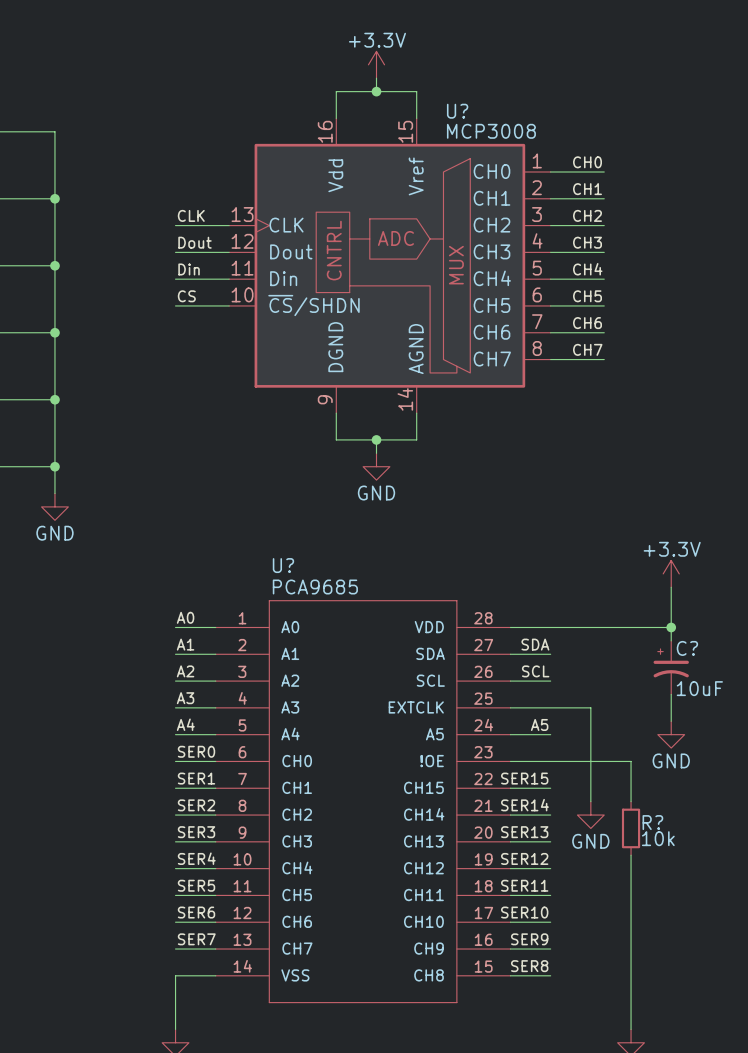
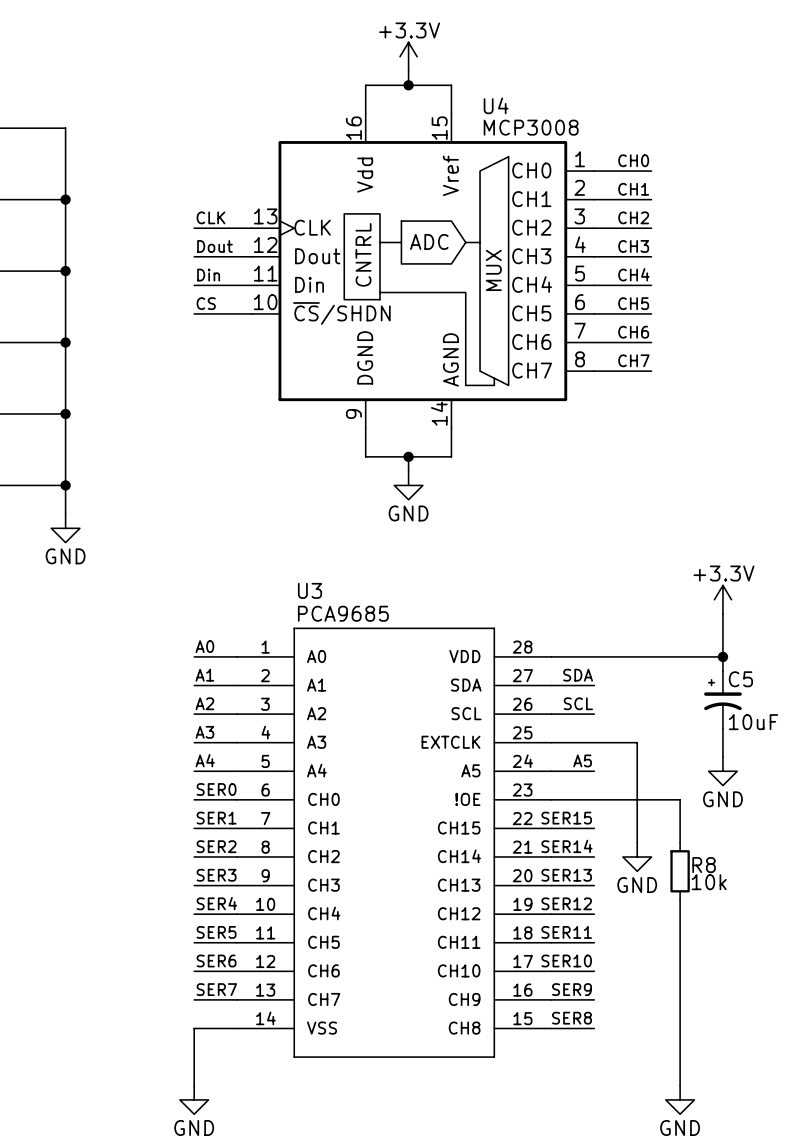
U? name: U? (457, 111) -> U4 (496, 105)
U? name: U? (283, 565) -> U3 (310, 590)
C? name: C? (687, 648) -> C5 (740, 679)
R? name: R? (652, 822) -> R8 (704, 865)

